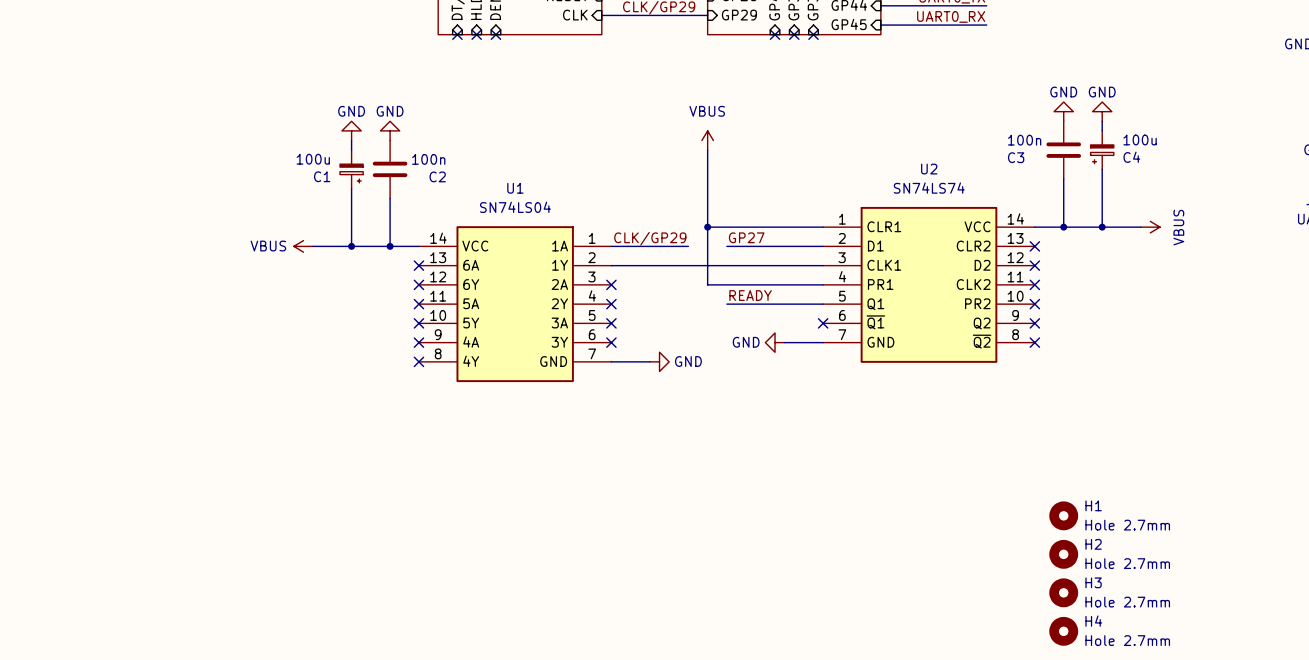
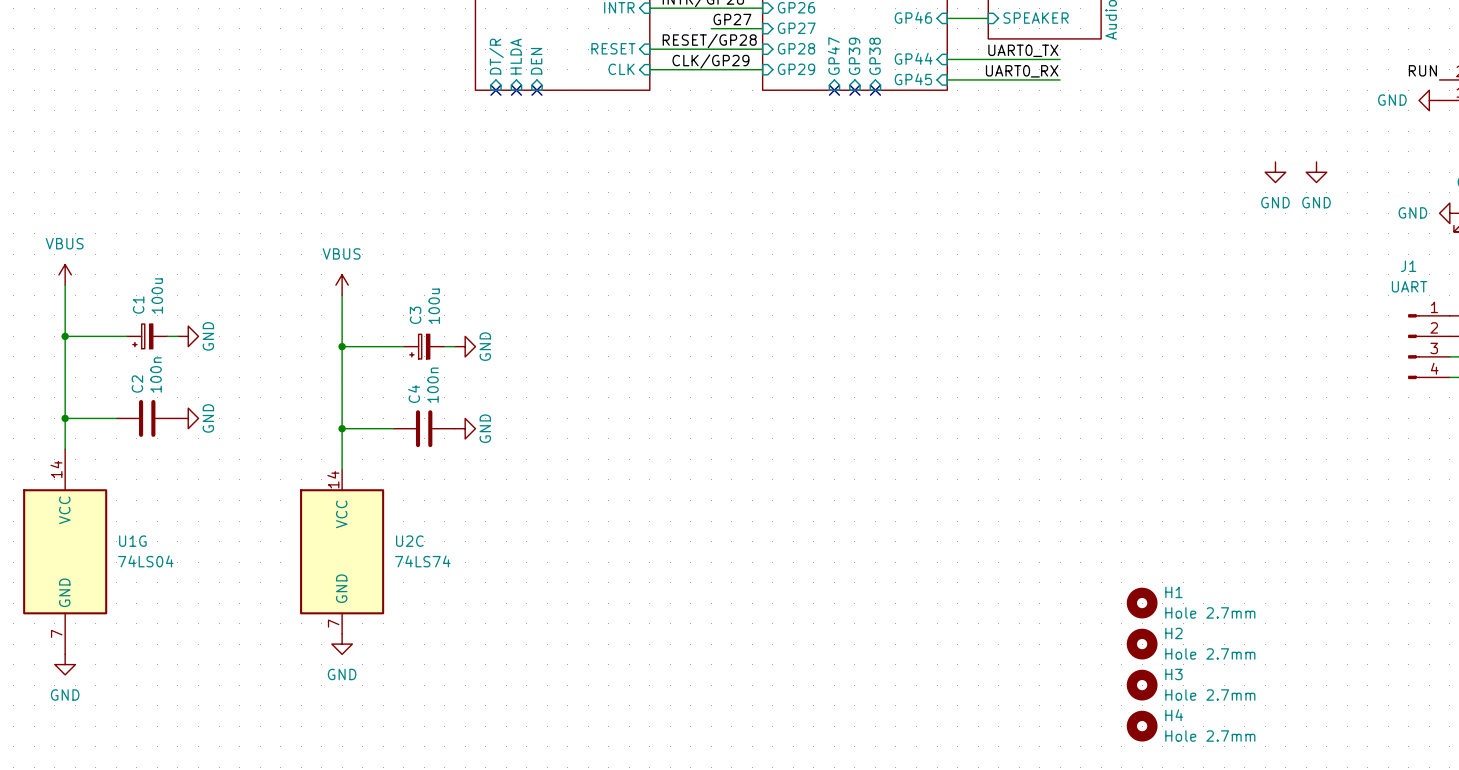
power symbol: GND (1063, 111) -> none
power symbol: GND (1102, 111) -> none
power symbol: none -> GND (1275, 172)
power symbol: none -> GND (1316, 172)
C3 symbol: [1046, 121, 1082, 180] -> [403, 334, 445, 359]
wire: (1102, 121) (1102, 130) -> none
power symbol: GND (351, 130) -> none
power symbol: GND (390, 130) -> none
C4 symbol: [1090, 130, 1114, 170] -> [393, 410, 455, 448]
C4 value: 100u (1140, 139) -> 100n (433, 385)
wire: (351, 140) (351, 150) -> none
power symbol: VBUS (707, 140) -> none
C3 value: 100n (1024, 140) -> 100u (434, 306)
wire: (707, 150) (707, 284) (823, 284) -> none
C3 name position: C3 (1016, 157) -> C3 (415, 315)
C4 name position: C4 (1131, 157) -> C4 (414, 394)
C2 value position: 100n (428, 159) -> 100n (156, 374)
C1 position: (351, 169) -> (147, 336)
C2 rotation: 0° (390, 169) -> 90° clockwise (147, 418)
C2 position: (390, 169) -> (147, 418)
wire: (1102, 169) (1102, 227) -> none
C1 rotation: 0° (351, 173) -> 90° clockwise (142, 336)
C2 name position: C2 (437, 176) -> C2 (137, 384)
wire: (1063, 179) (1063, 227) -> none
wire: (351, 188) (351, 246) -> none
wire: (390, 198) (390, 246) -> none
power symbol: none -> VBUS (65, 274)
wire: none -> (65, 285) (65, 449)
wire: none -> (342, 295) (342, 469)
wire: (707, 227) (823, 227) -> none
junction: (707, 227) -> none
wire: (1034, 227) (1140, 227) -> none
junction: (1063, 227) -> none
junction: (1102, 227) -> none
power symbol: VBUS (1150, 227) -> none
label: GP27 (746, 237) -> none
label: CLK/GP29 (650, 238) -> none
power symbol rotation: 0° (303, 246) -> 90° clockwise (342, 285)
power symbol position: VBUS (303, 246) -> VBUS (342, 285)
wire: (313, 246) (418, 246) -> none
junction: (351, 246) -> none
junction: (390, 246) -> none
wire: (611, 246) (688, 246) -> none
wire: (726, 246) (823, 246) -> none
no-connect mark: (1034, 246) -> none
wire: none -> (65, 336) (126, 336)
junction: none -> (65, 336)
wire: none -> (167, 336) (177, 336)
power symbol: none -> GND (188, 336)
no-connect mark: (418, 265) -> none
wire: (611, 265) (823, 265) -> none
no-connect mark: (1034, 265) -> none
wire: none -> (342, 346) (403, 346)
junction: none -> (342, 346)
wire: none -> (444, 346) (454, 346)
power symbol: none -> GND (465, 346)
no-connect mark: (418, 284) -> none
no-connect mark: (611, 284) -> none
U2: SN74LS74 (928, 284) -> none
no-connect mark: (1034, 284) -> none
label: READY (750, 295) -> none
no-connect mark: (418, 304) -> none
U1: SN74LS04 (515, 304) -> none
no-connect mark: (611, 304) -> none
wire: (726, 304) (823, 304) -> none
no-connect mark: (1034, 304) -> none
no-connect mark: (418, 323) -> none
no-connect mark: (611, 323) -> none
no-connect mark: (823, 323) -> none
no-connect mark: (1034, 323) -> none
wire: none -> (65, 418) (116, 418)
junction: none -> (65, 418)
power symbol: none -> GND (188, 418)
no-connect mark: (418, 342) -> none
no-connect mark: (611, 342) -> none
power symbol: GND (775, 342) -> none
wire: (784, 342) (823, 342) -> none
no-connect mark: (1034, 342) -> none
wire: none -> (342, 428) (393, 428)
junction: none -> (342, 428)
power symbol: none -> GND (465, 428)
no-connect mark: (418, 361) -> none
wire: (611, 361) (649, 361) -> none
power symbol: GND (659, 361) -> none
U1G: none -> 74LS04 (65, 551)
U2C: none -> 74LS74 (342, 551)
power symbol: none -> GND (342, 644)
power symbol: none -> GND (65, 664)

